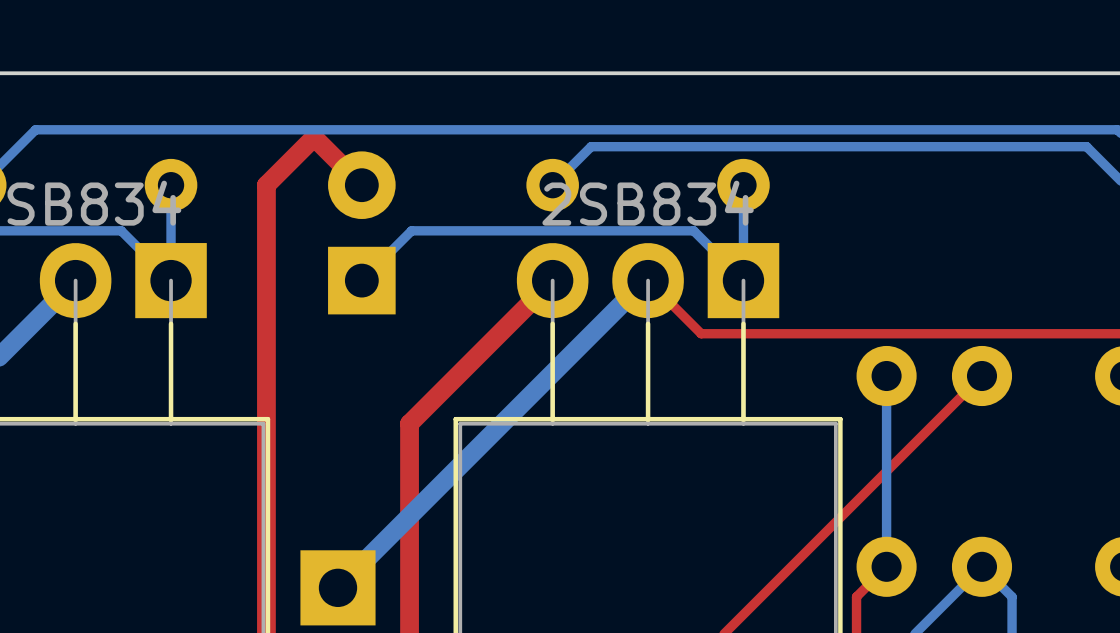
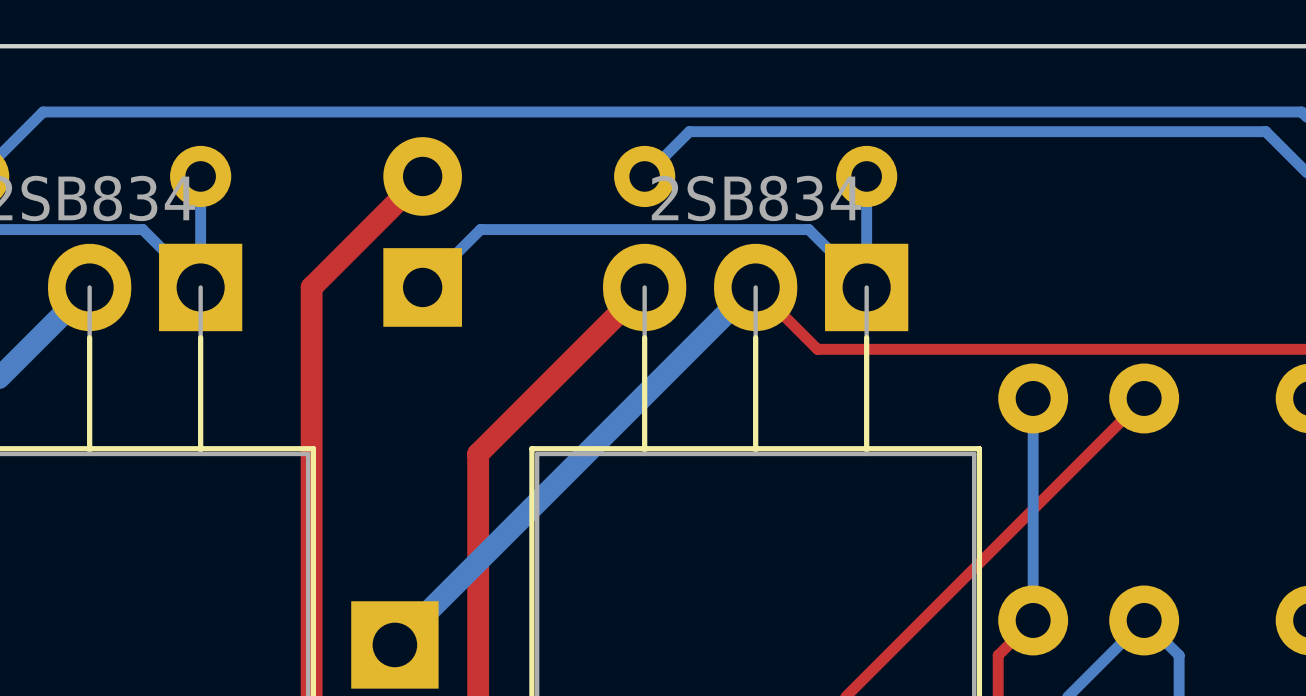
top track: (361, 185) (314, 137) (266, 185) (266, 280) -> (422, 176) (311, 287)

